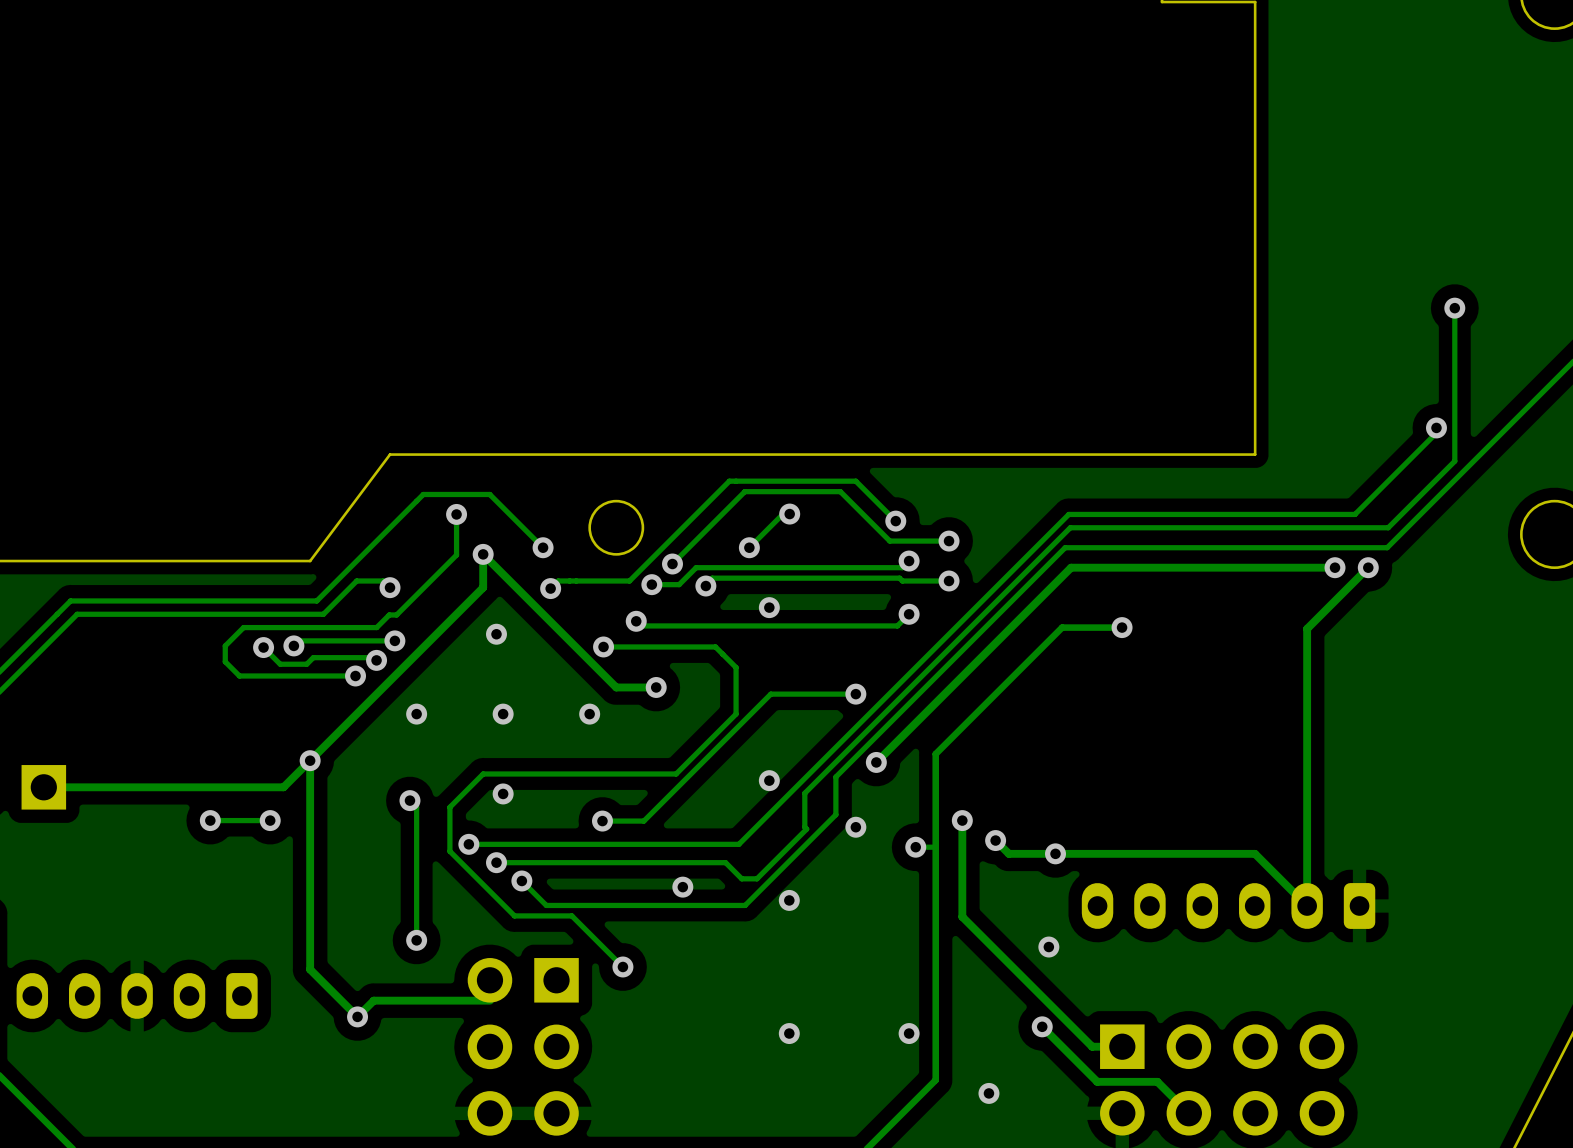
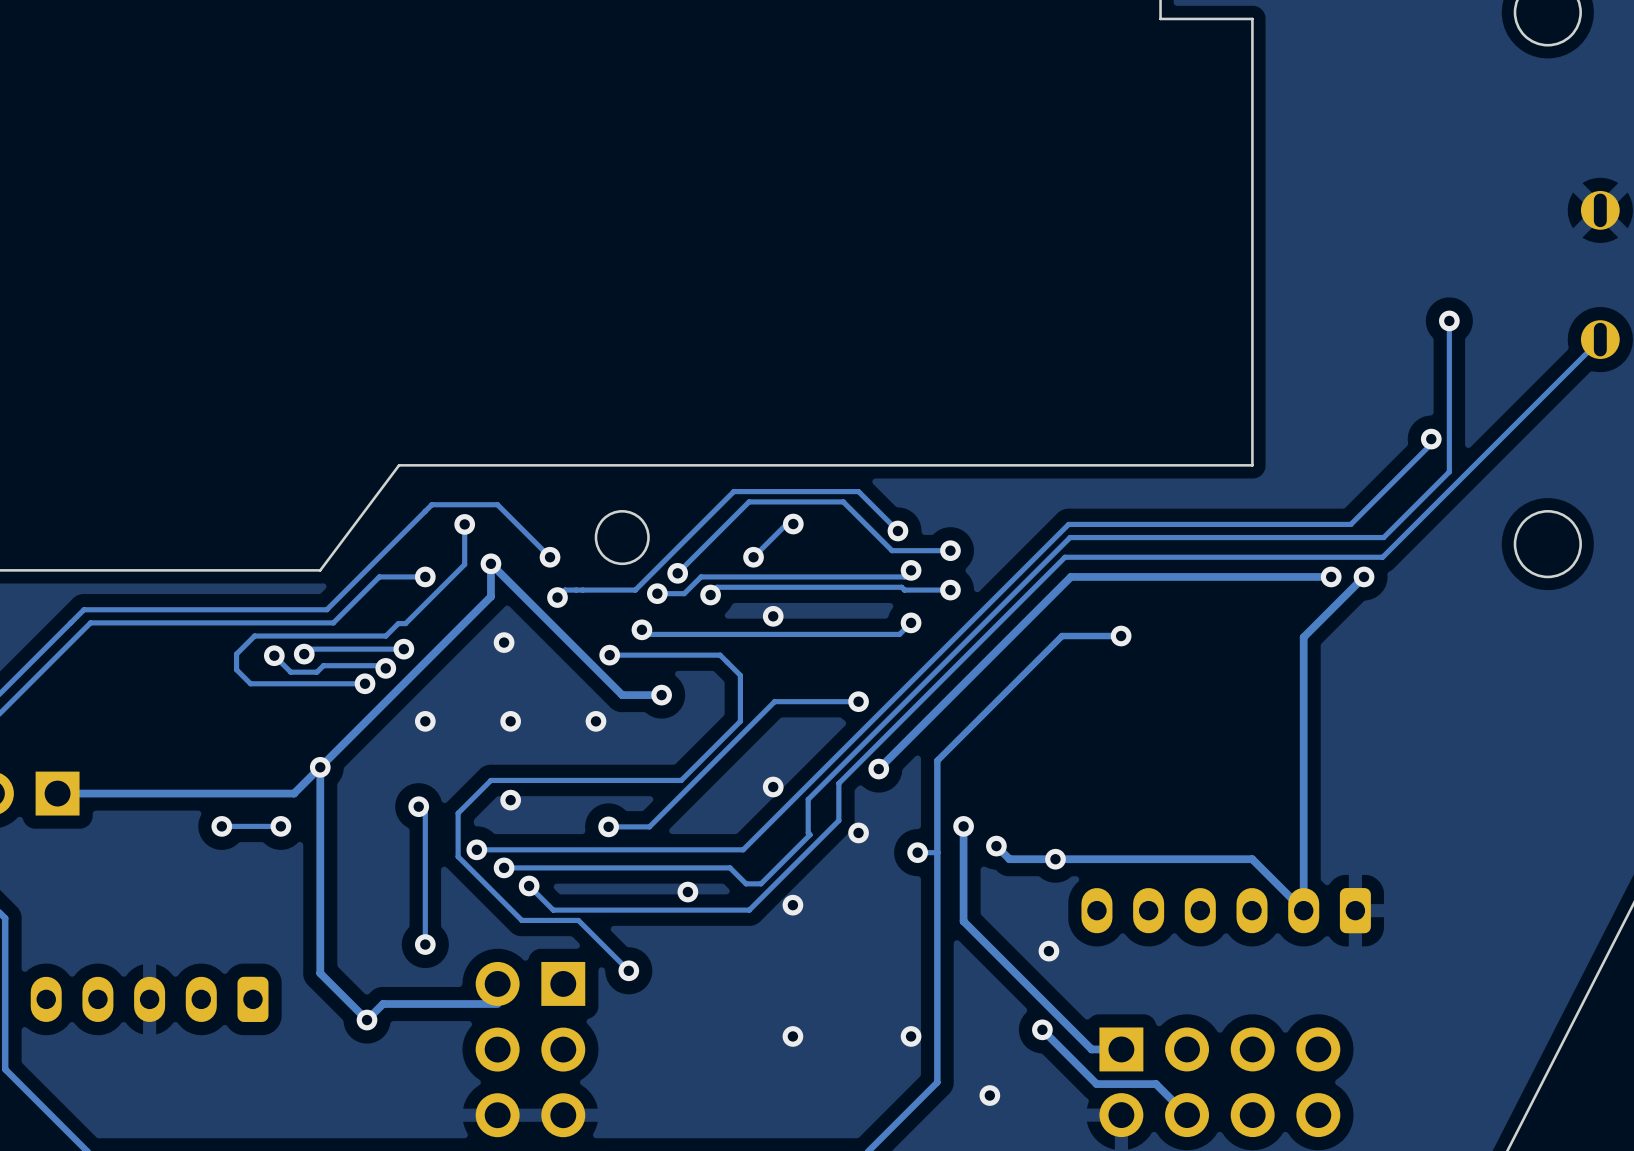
track: (356, 581) (383, 581) (390, 587) -> (366, 590) (379, 576) (425, 576)
via position: (390, 587) -> (425, 576)

